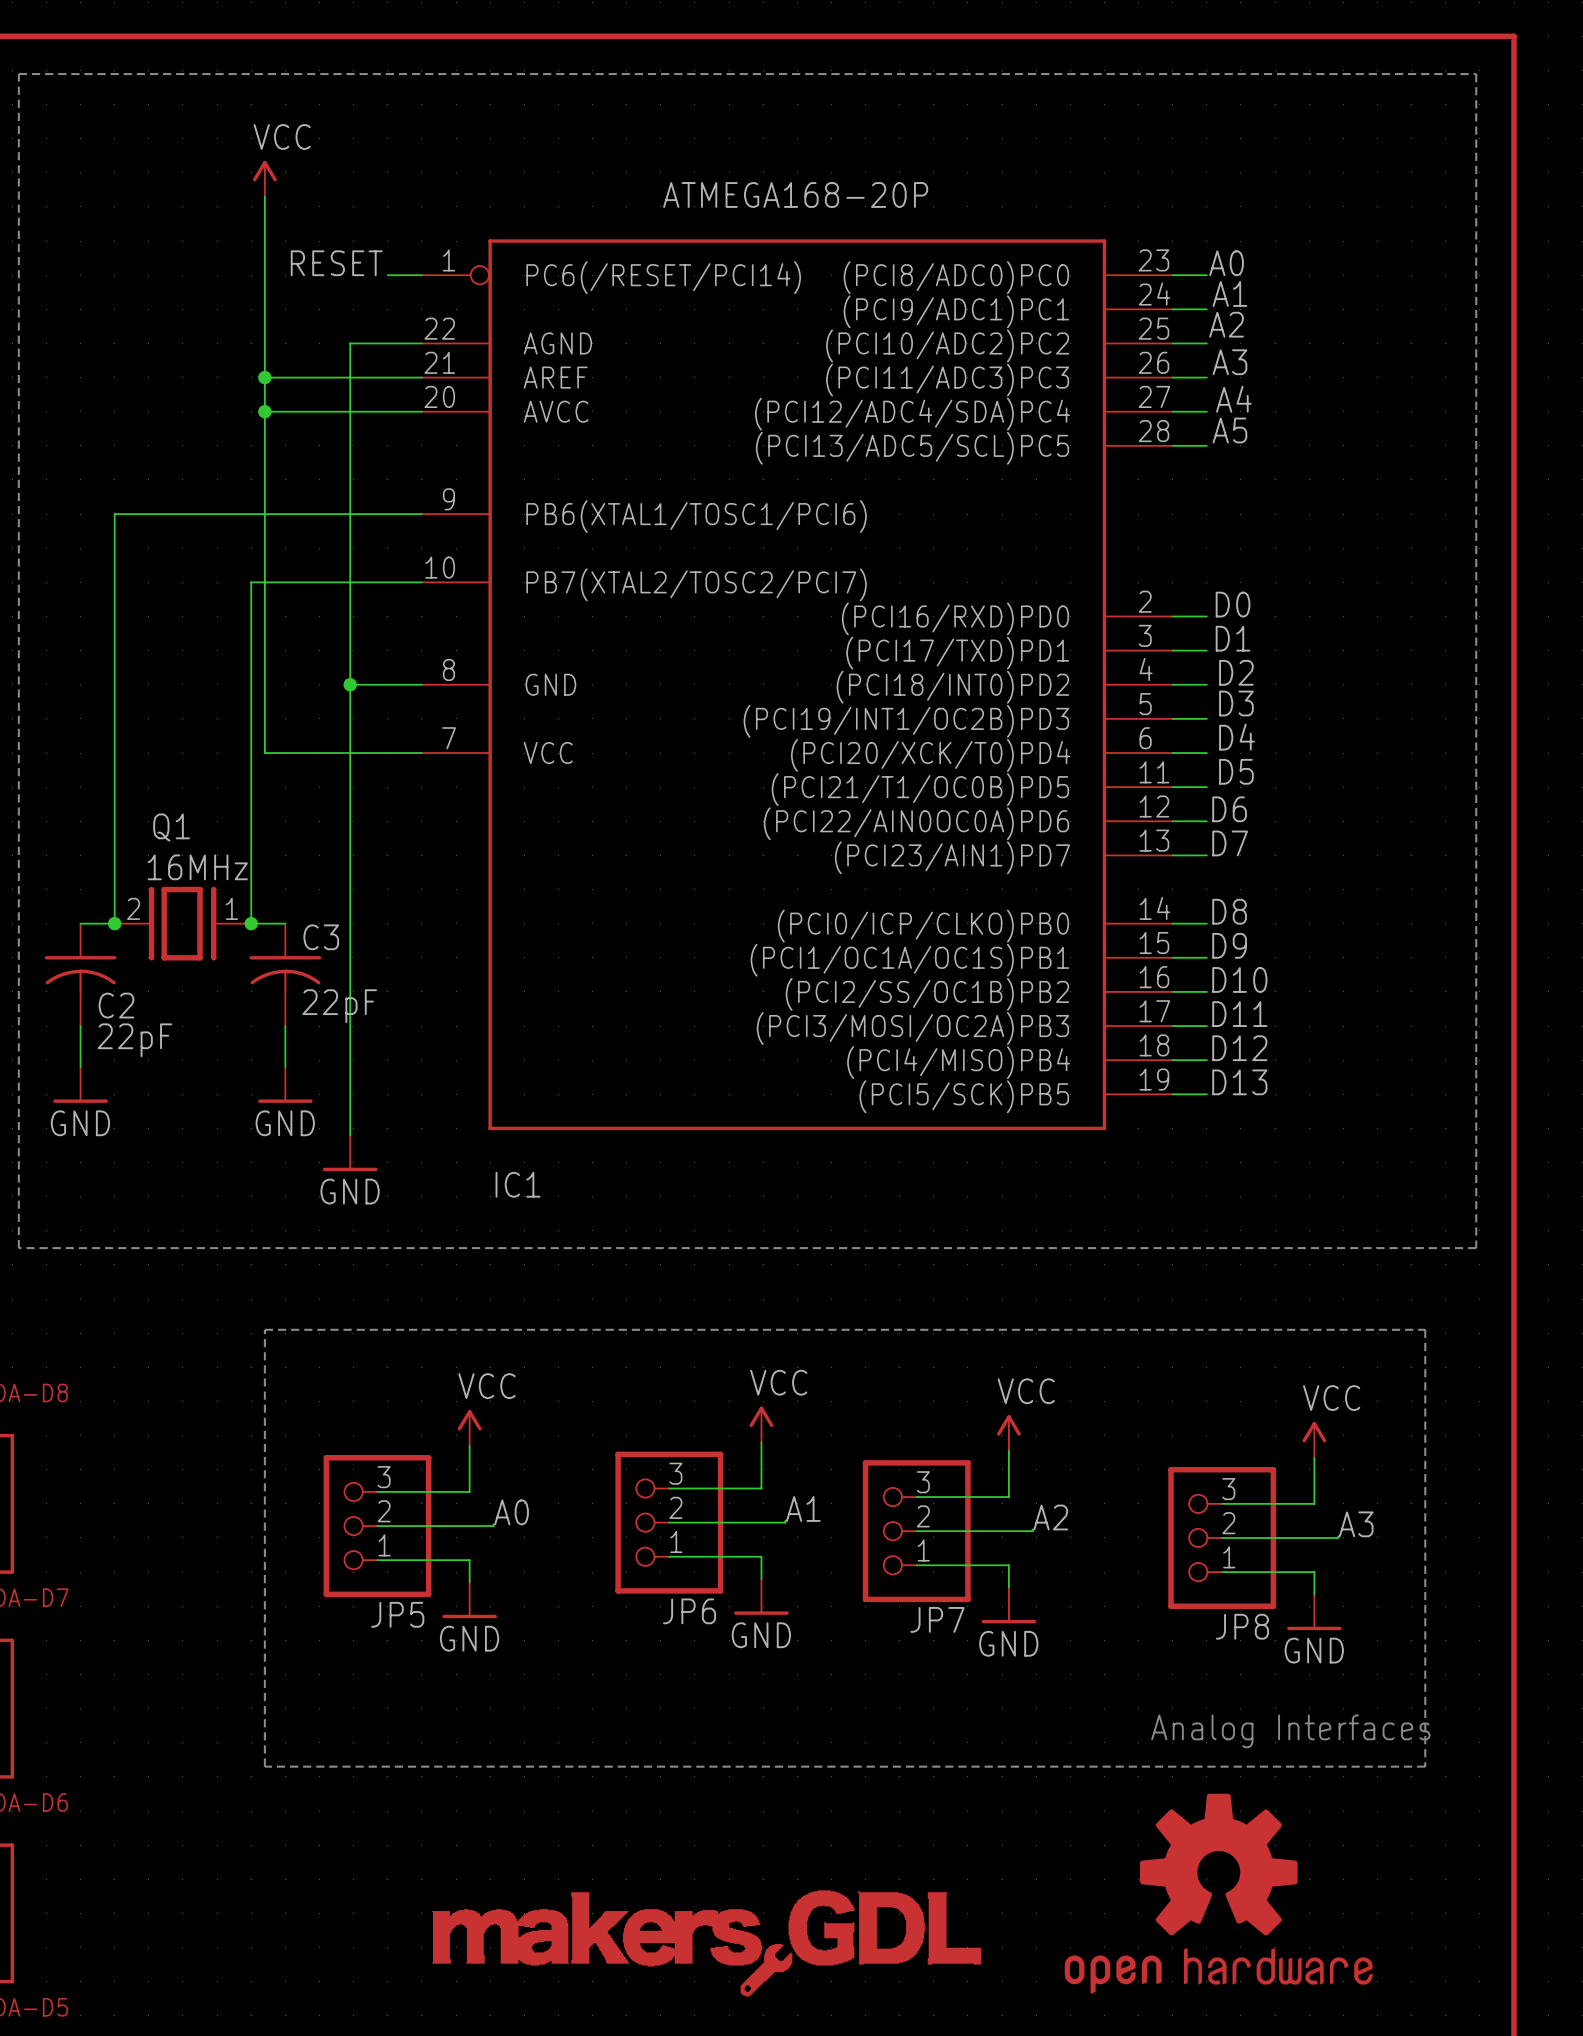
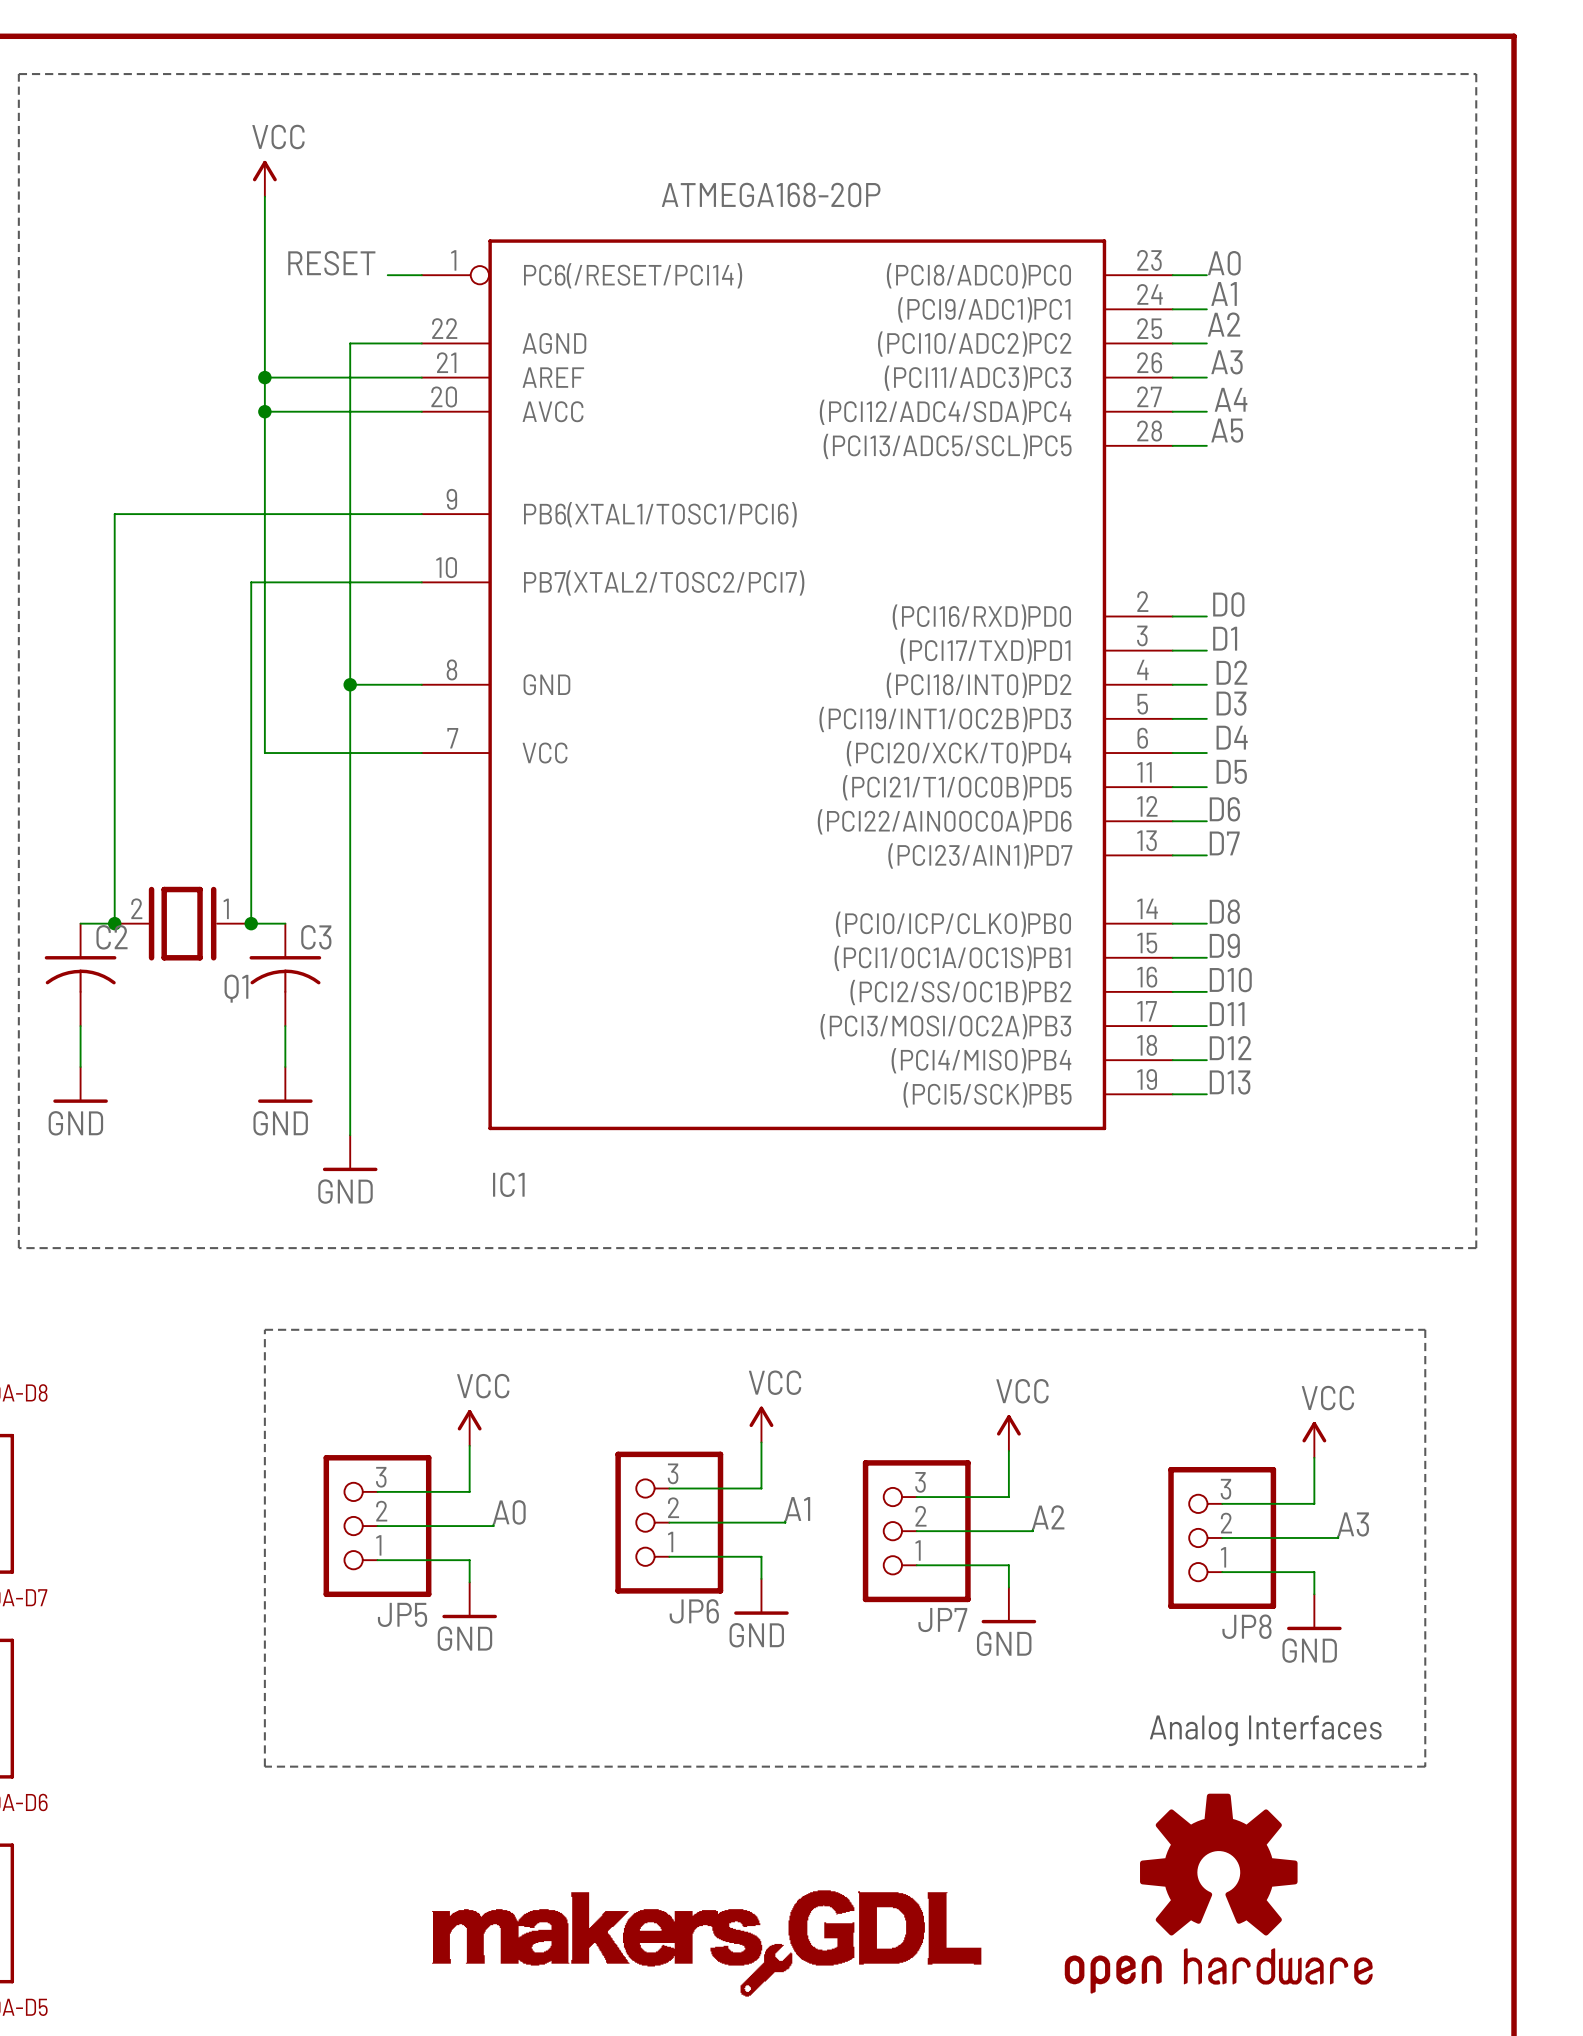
Q1 name position: Q1 (171, 827) -> Q1 (236, 988)
Q1 value: 16MHz (197, 867) -> none
C2 name position: C2 (116, 1005) -> C2 (111, 937)
C3 value: 22pF (339, 1006) -> none
C2 value: 22pF (134, 1040) -> none

